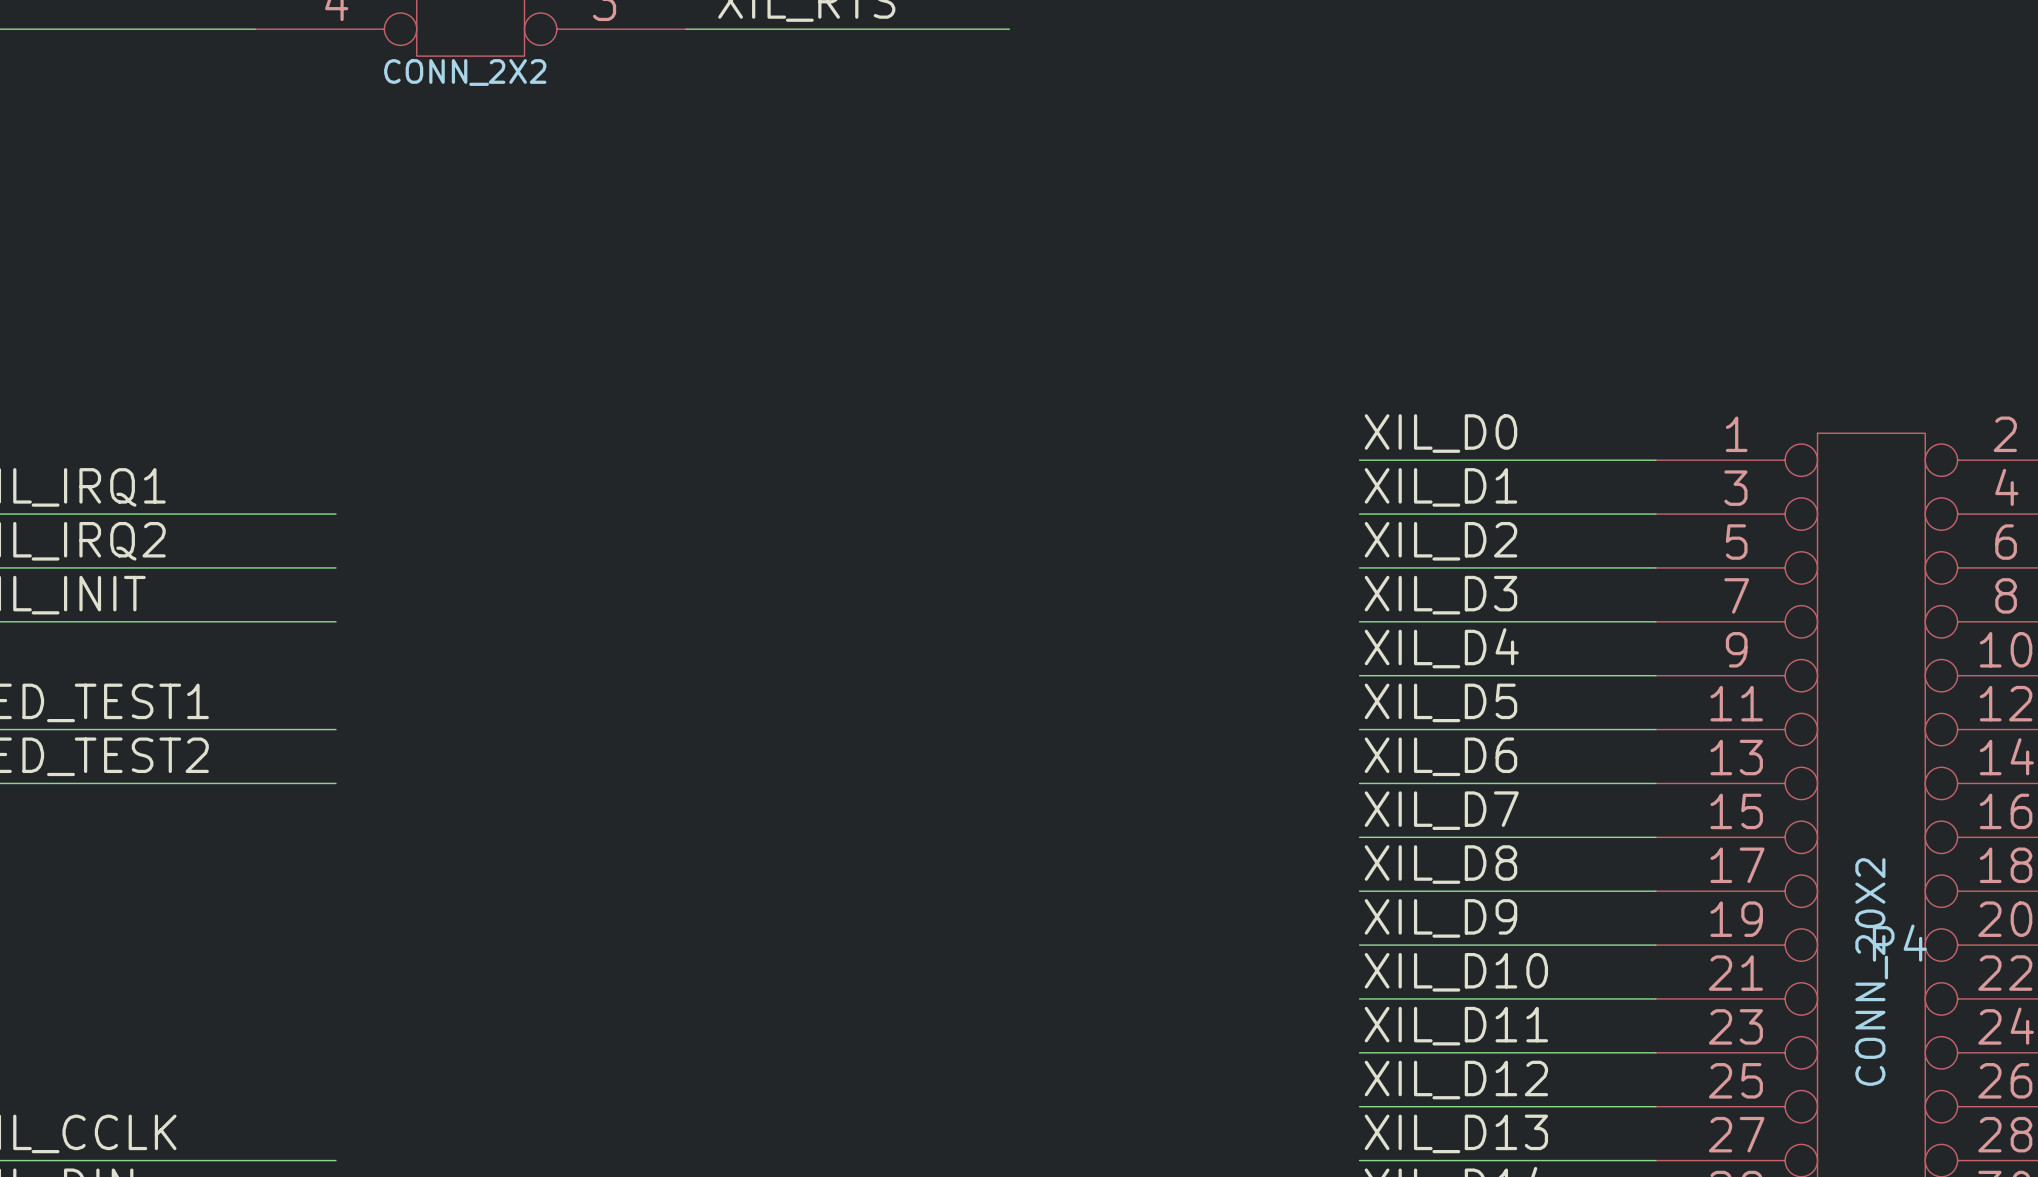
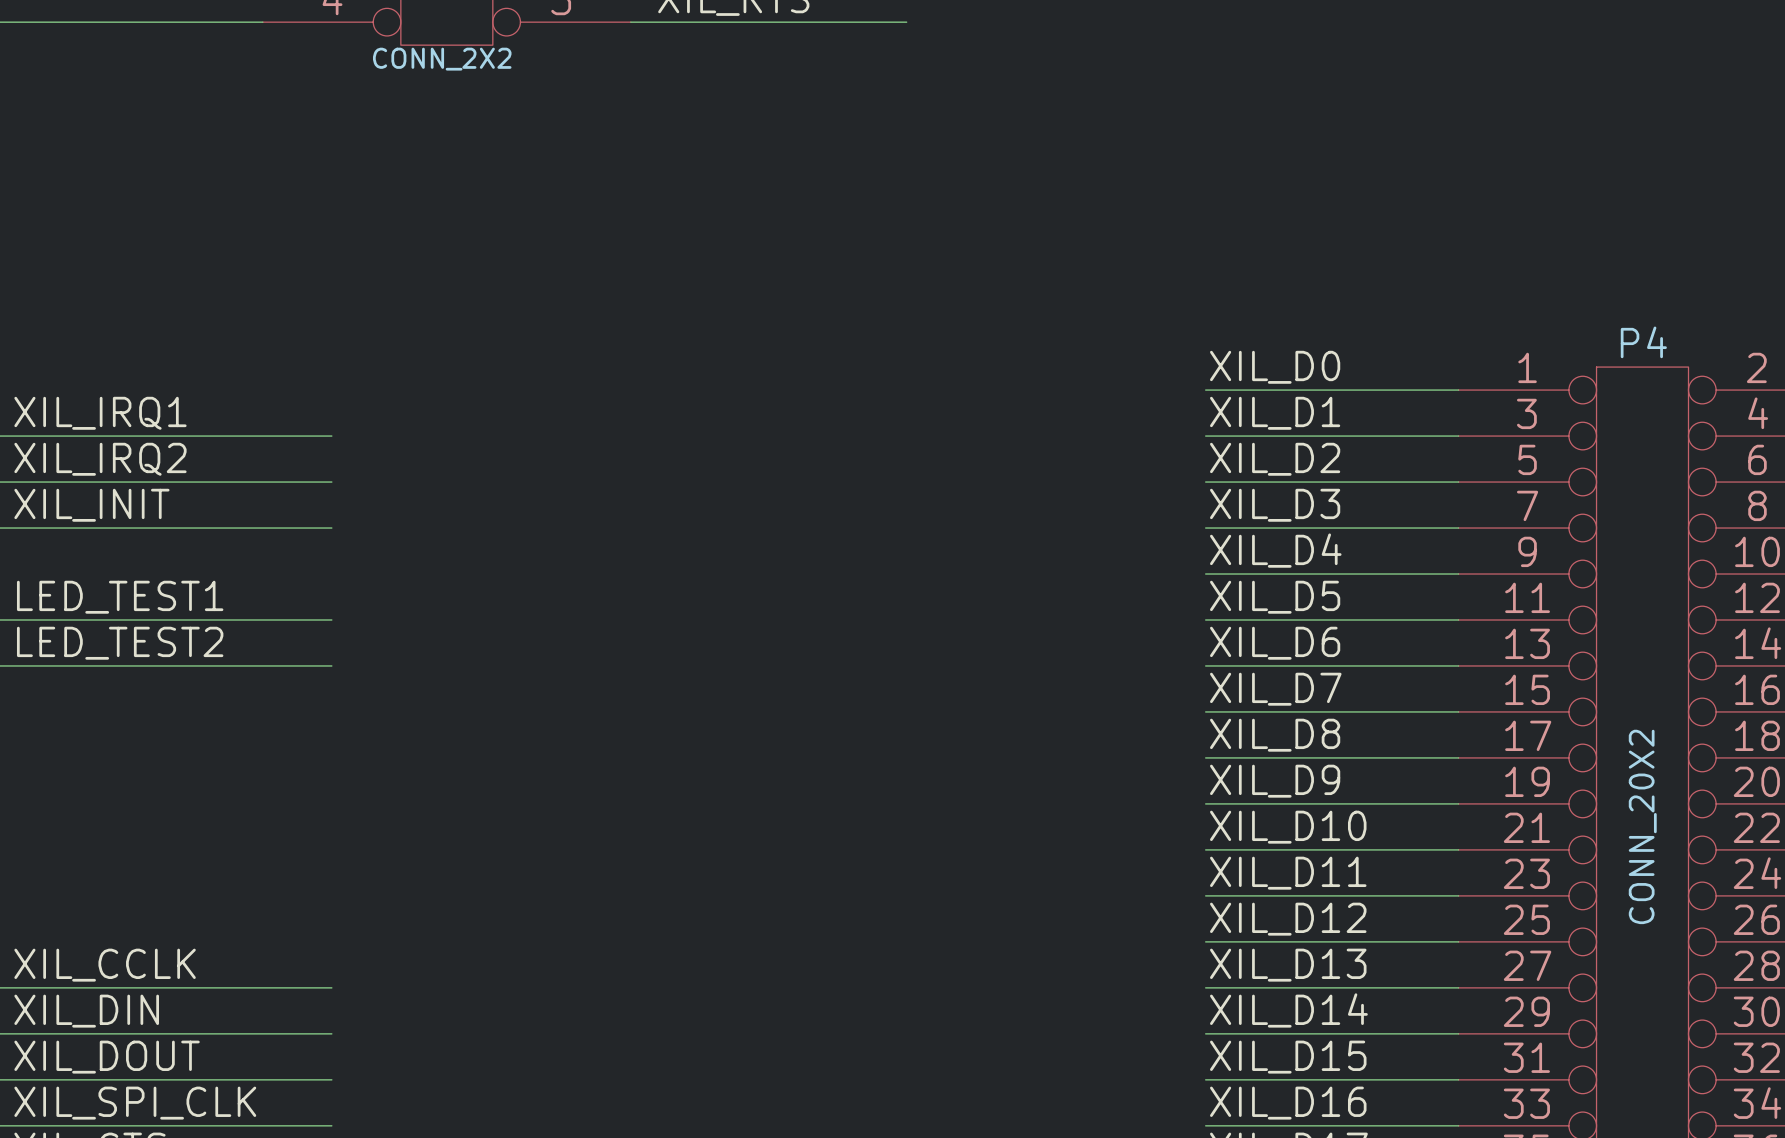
P4 name position: P4 (1899, 943) -> P4 (1643, 342)

